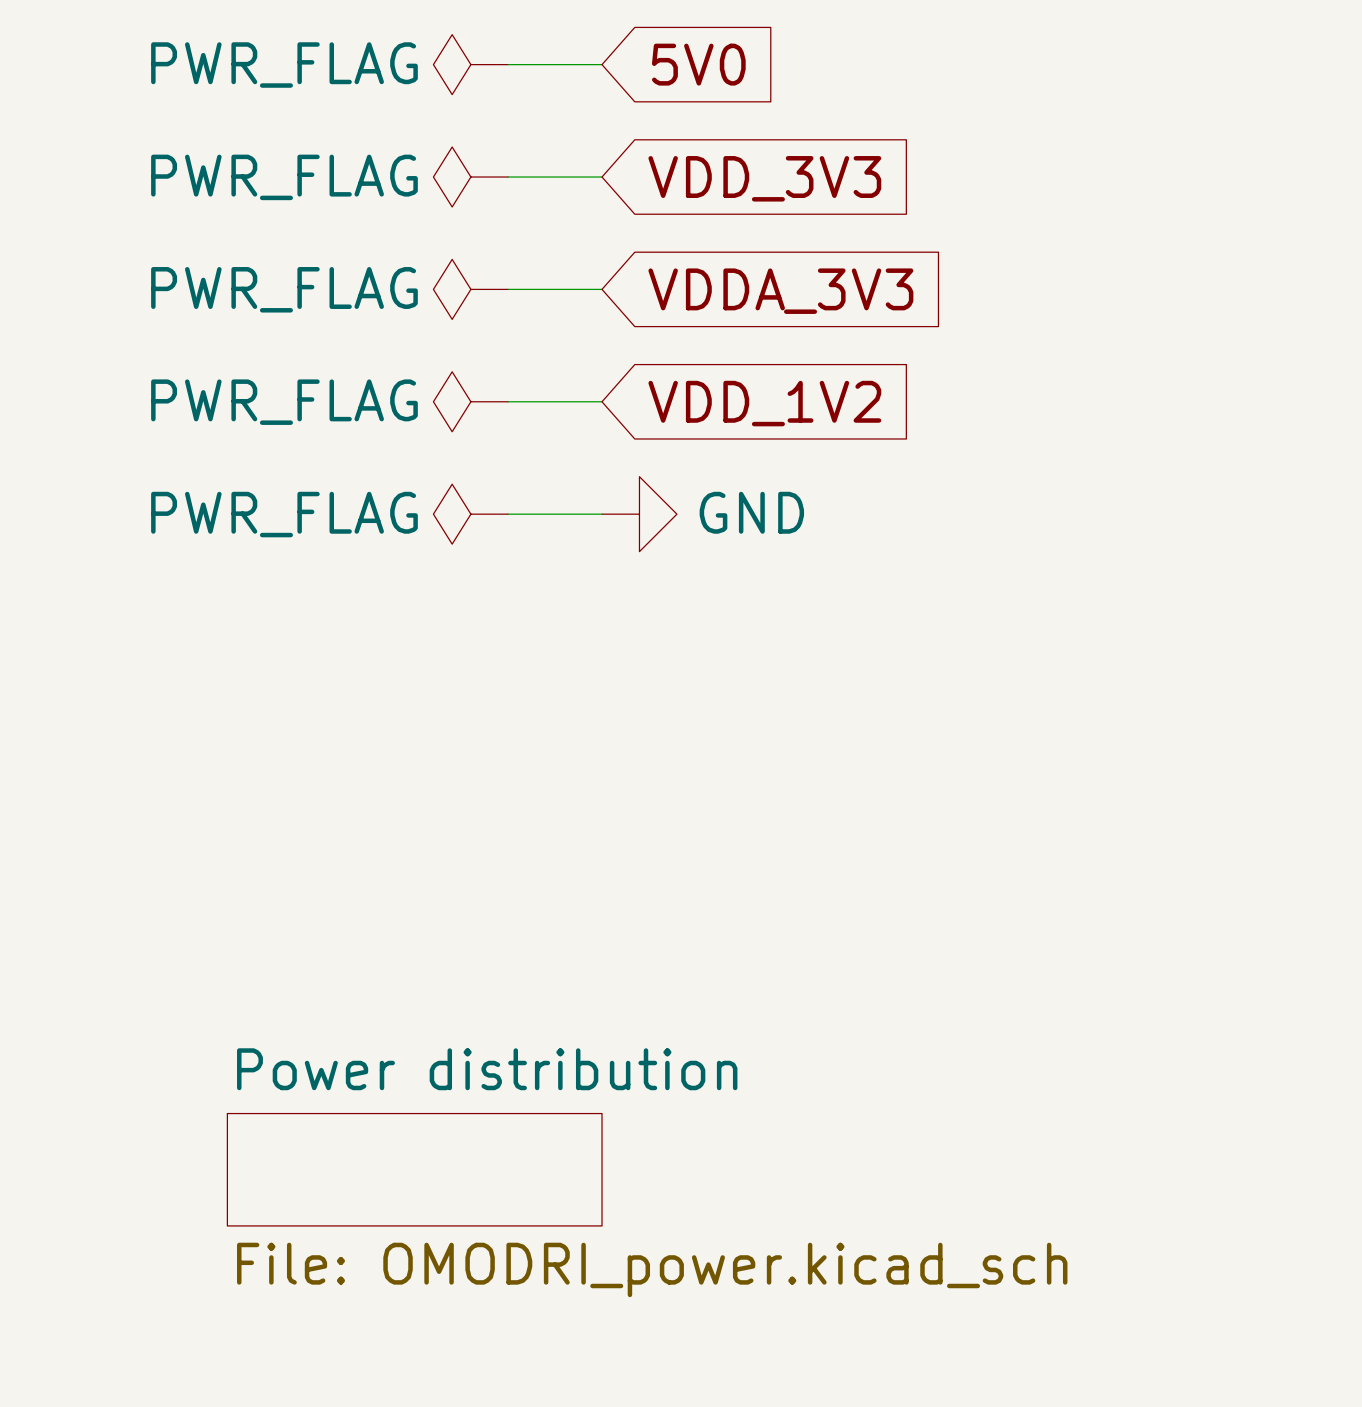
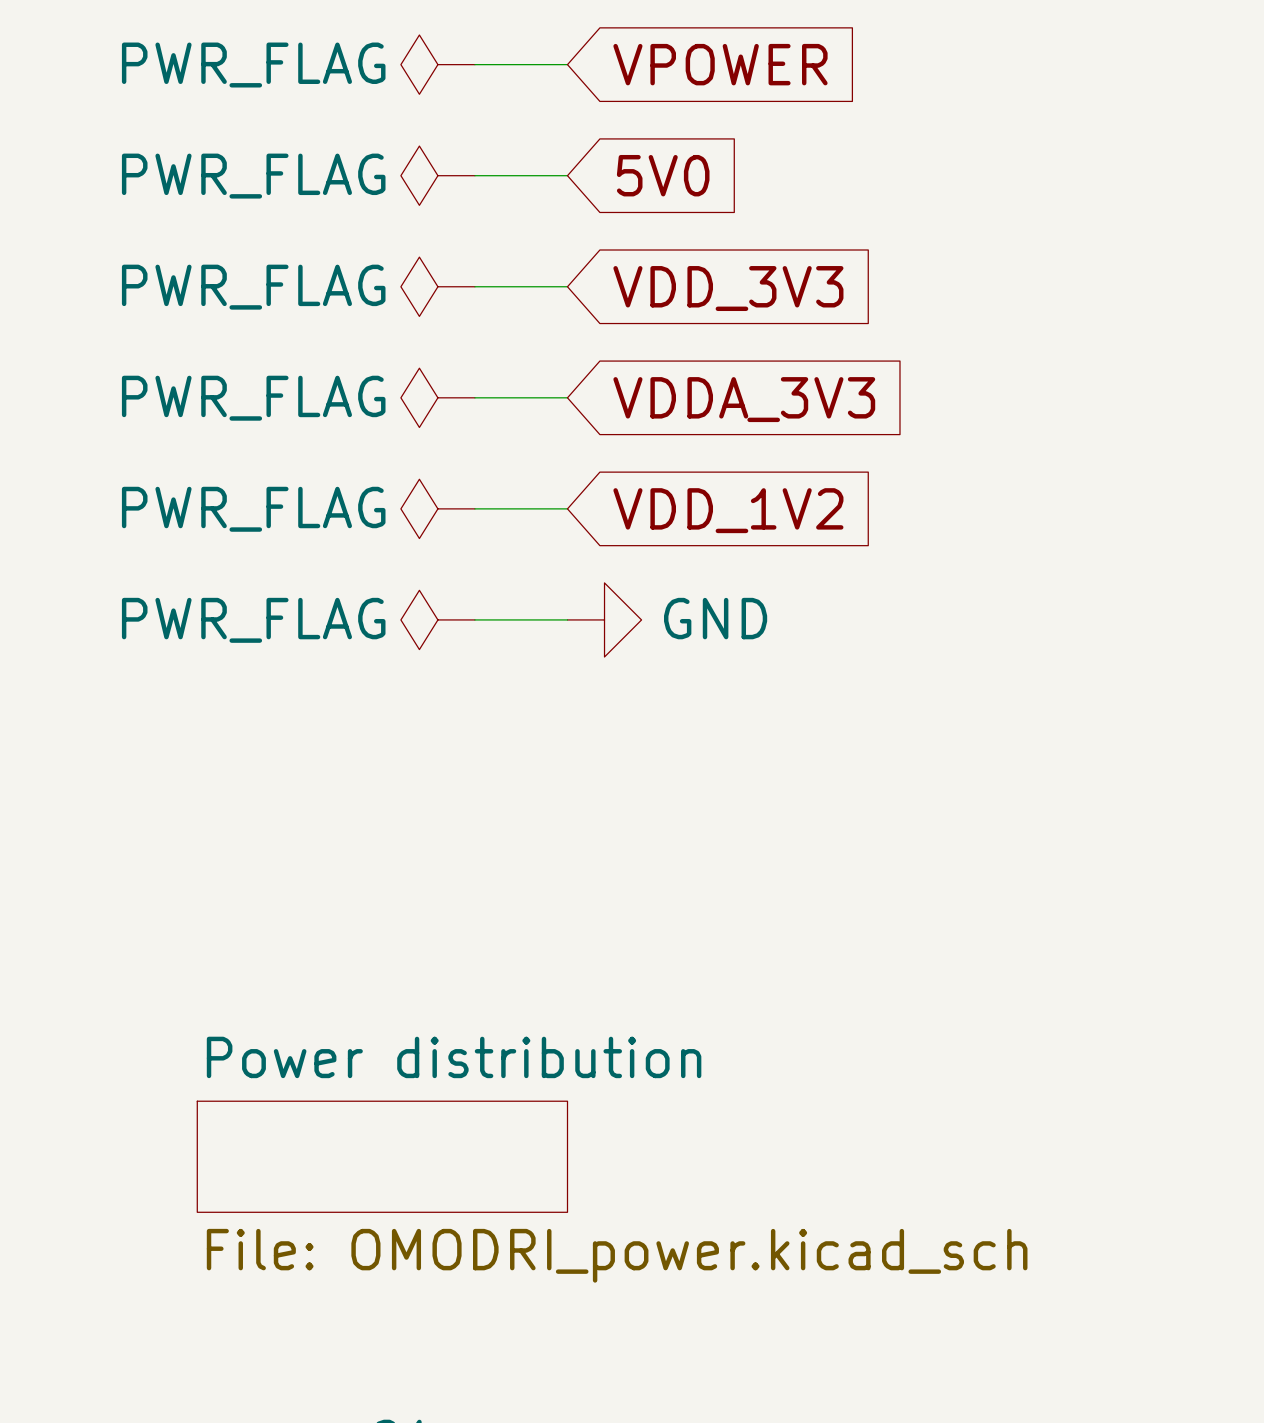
global label: 5V0 (698, 64) -> VPOWER (720, 64)
global label: VDD_3V3 (764, 178) -> 5V0 (663, 175)
global label: VDDA_3V3 (780, 291) -> VDD_3V3 (728, 288)
global label: VDD_1V2 (764, 403) -> VDDA_3V3 (744, 399)
power symbol position: GND (639, 514) -> GND (604, 619)
global label: none -> VDD_1V2 (728, 510)
power symbol: none -> PWR_FLAG (437, 619)
wire: none -> (474, 619) (567, 619)

